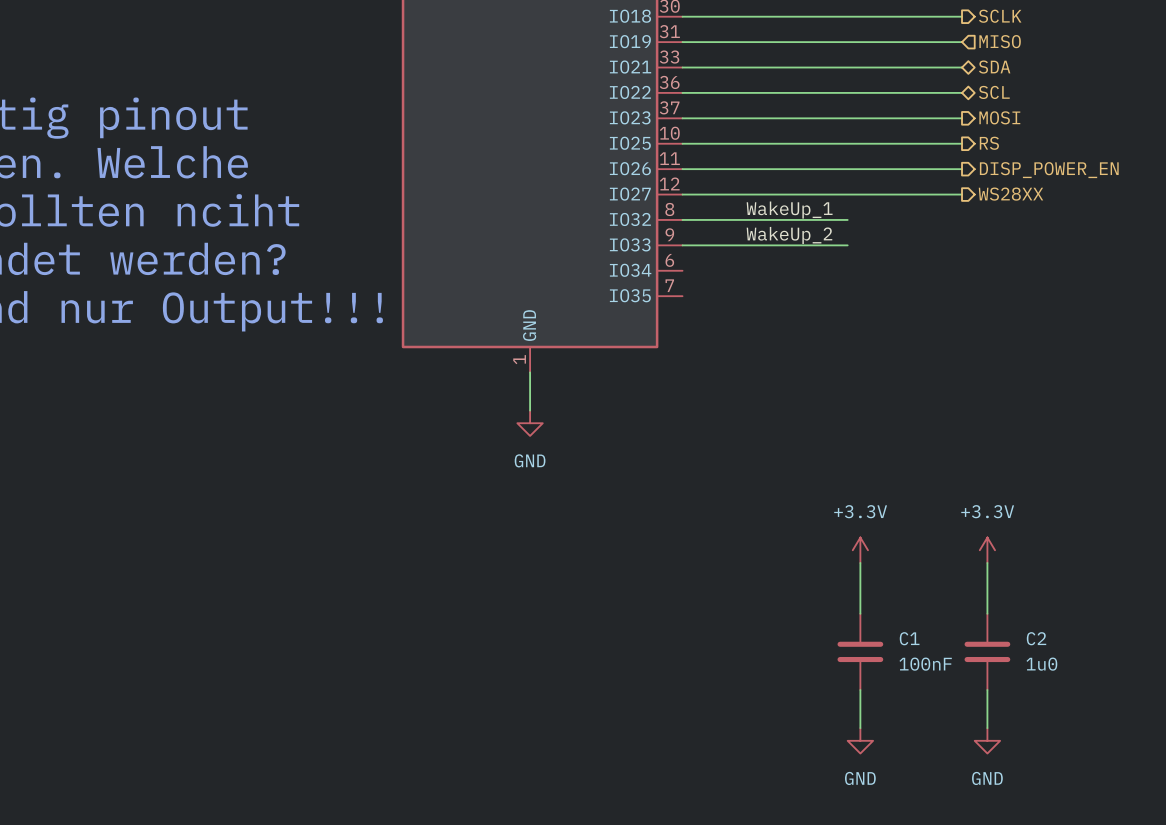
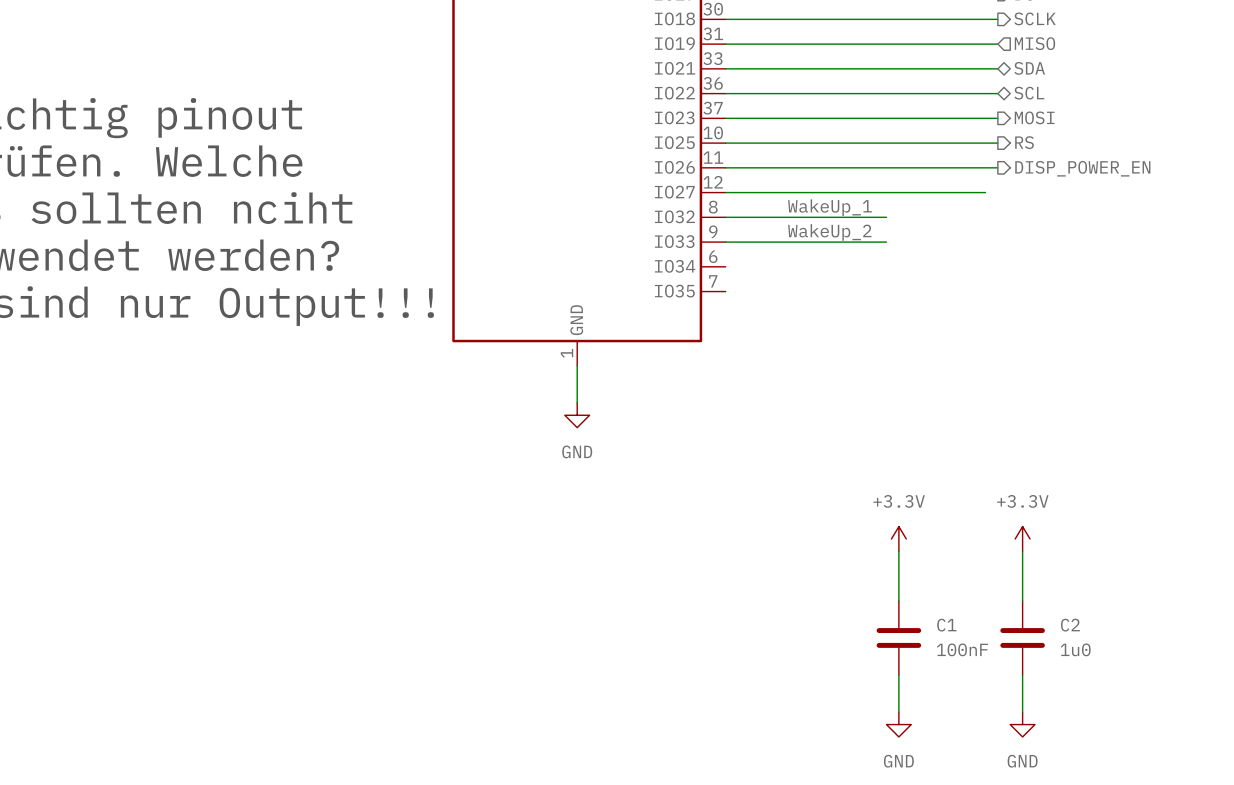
wire: (949, 194) (962, 194) -> none
hierarchical label: WS28XX (1011, 194) -> none

